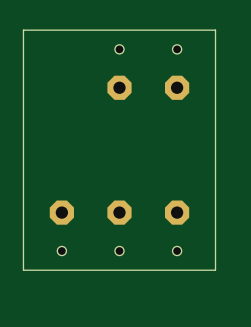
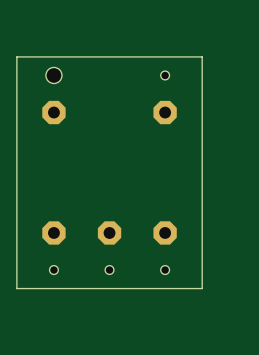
hole: none -> (53, 75)
hole: (119, 49) -> none
part position: (119, 87) -> (53, 112)

